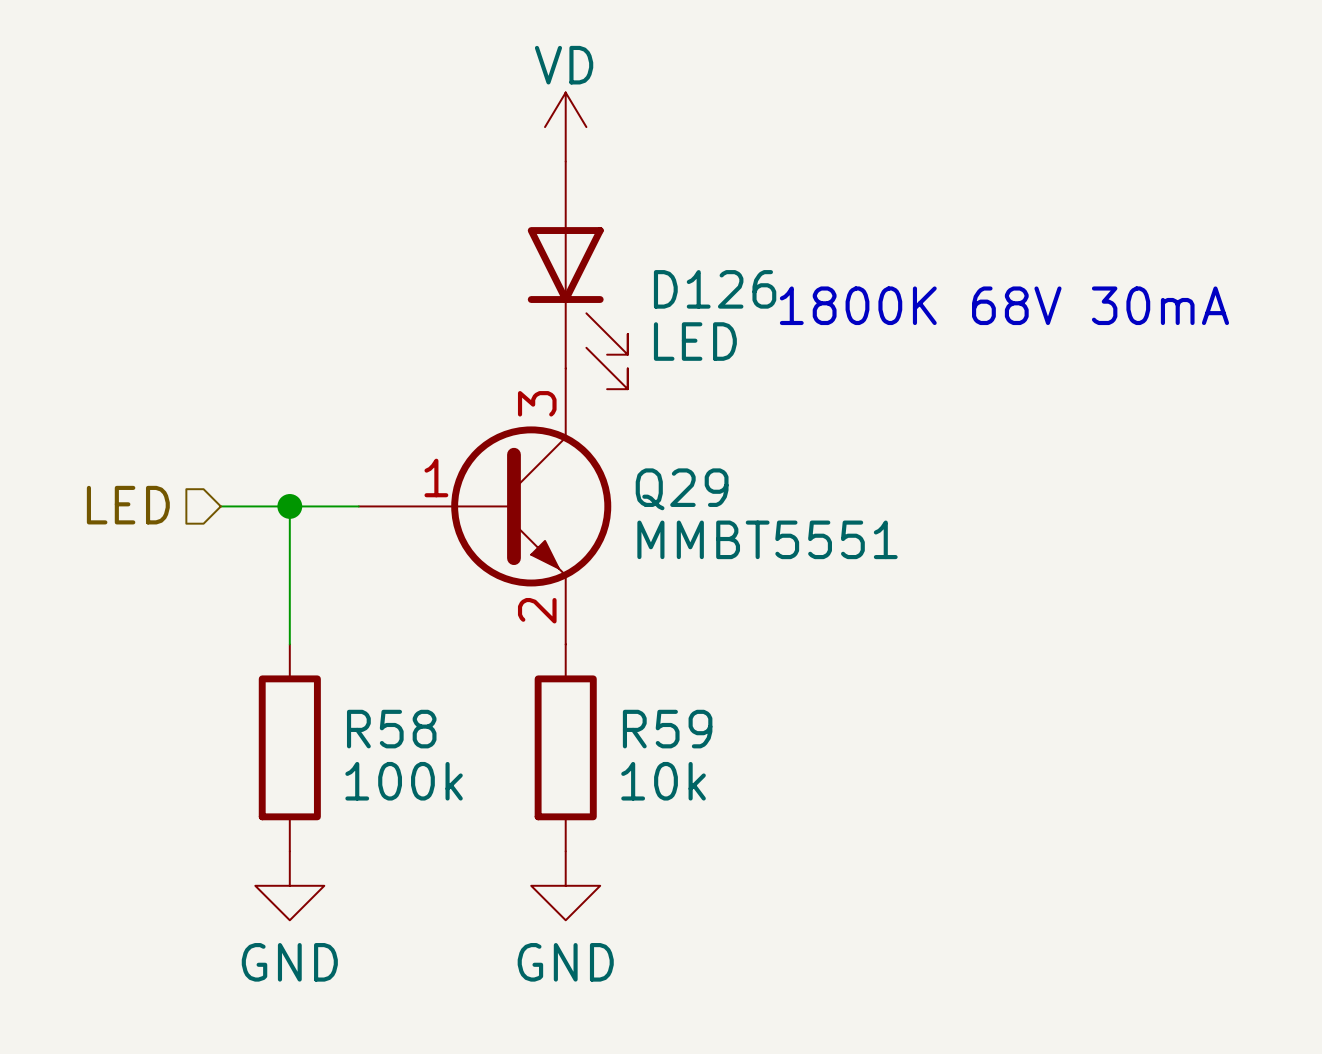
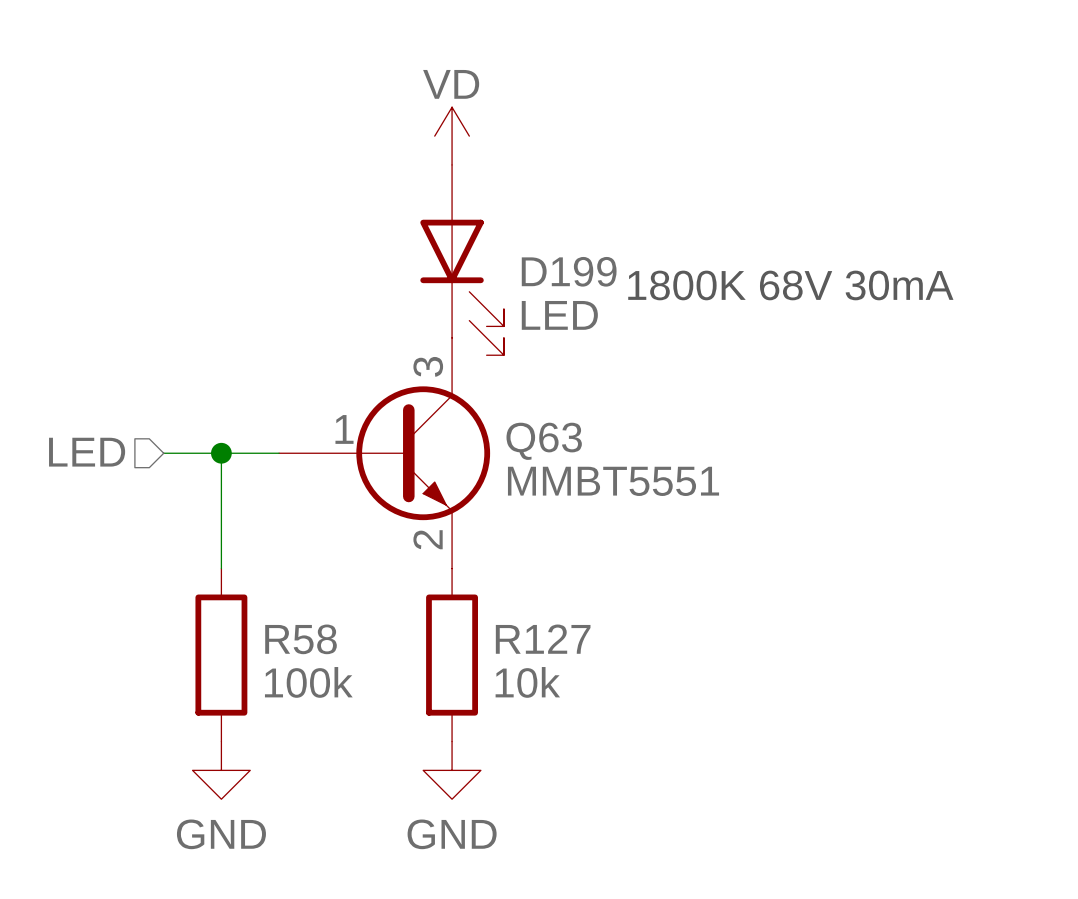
D126 name: D126 (715, 289) -> D199 (569, 271)
Q29 name: Q29 (682, 489) -> Q63 (544, 441)
R59 name: R59 (667, 729) -> R127 (543, 639)

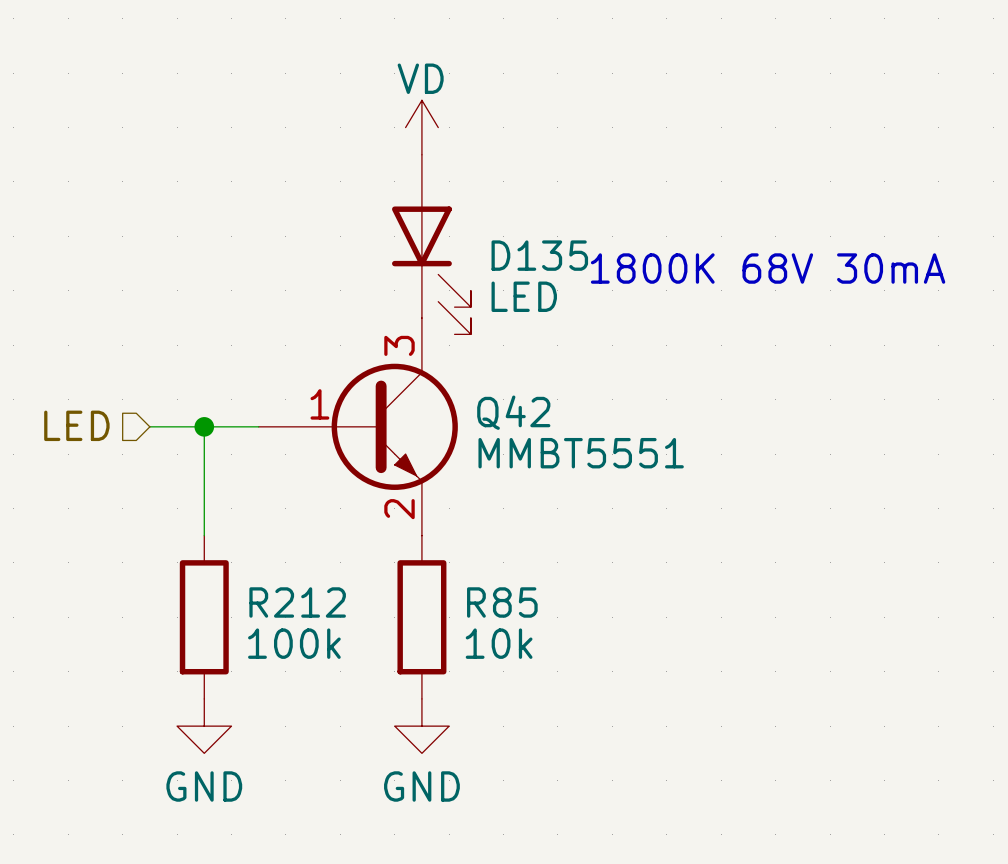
D199 name: D199 (569, 271) -> D135 (539, 255)
Q63 name: Q63 (544, 441) -> Q42 (513, 412)
R58 name: R58 (301, 639) -> R212 (297, 602)
R127 name: R127 (543, 639) -> R85 (502, 602)

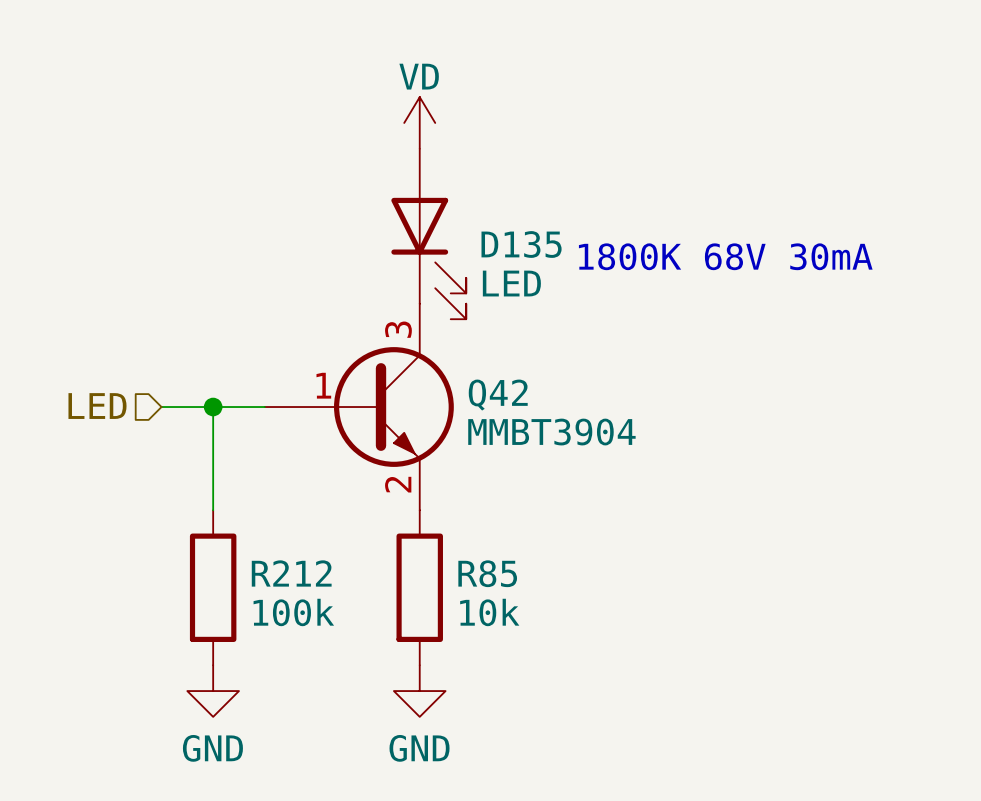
Q42 value: MMBT5551 (581, 453) -> MMBT3904 (551, 432)

